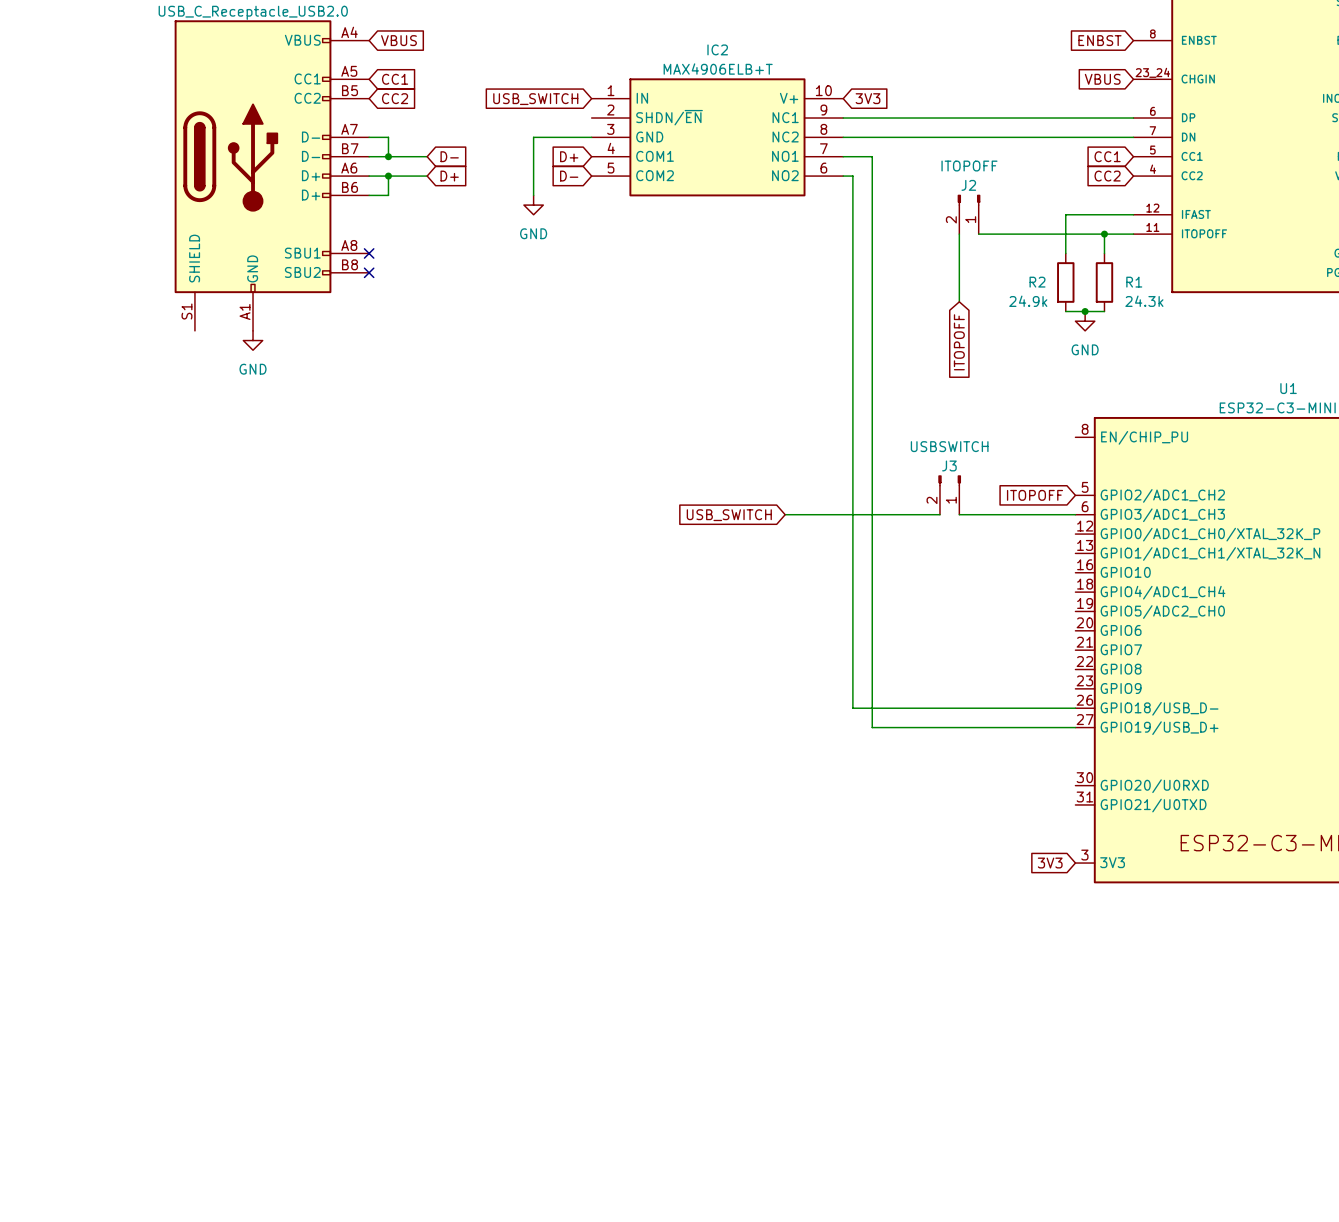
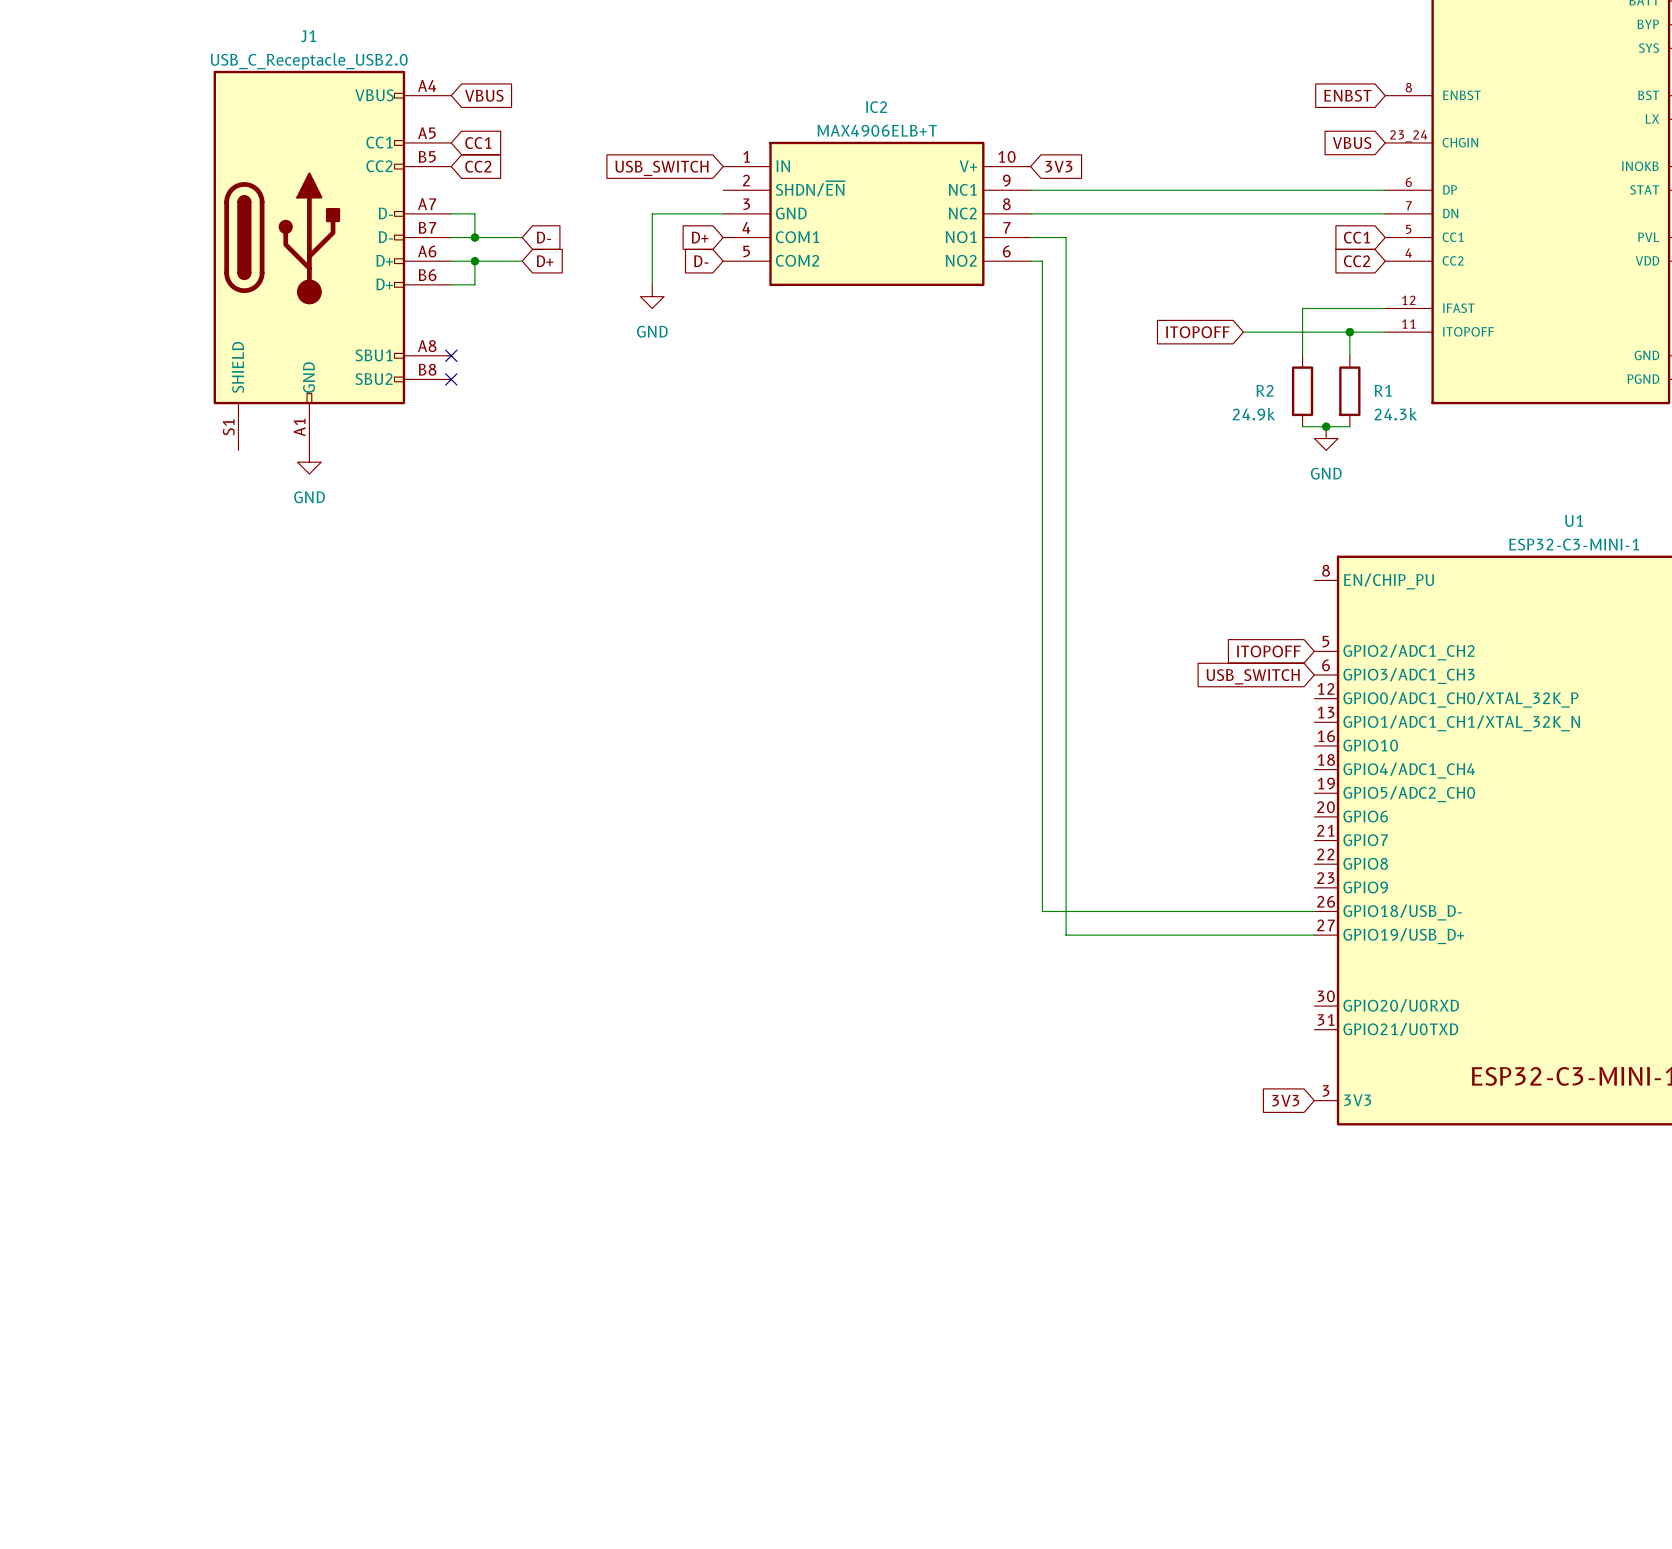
J2: ITOPOFF (969, 214) -> none
wire: (959, 234) (959, 301) -> none
wire: (978, 234) (1017, 234) -> none
global label rotation: 0° (959, 342) -> 90° clockwise (1197, 332)
global label position: ITOPOFF (959, 342) -> ITOPOFF (1197, 332)
J3: USBSWITCH (949, 495) -> none
wire: (785, 514) (939, 514) -> none
wire: (959, 514) (1075, 514) -> none
global label: USB_SWITCH (729, 515) -> none
global label: none -> USB_SWITCH (1253, 676)

